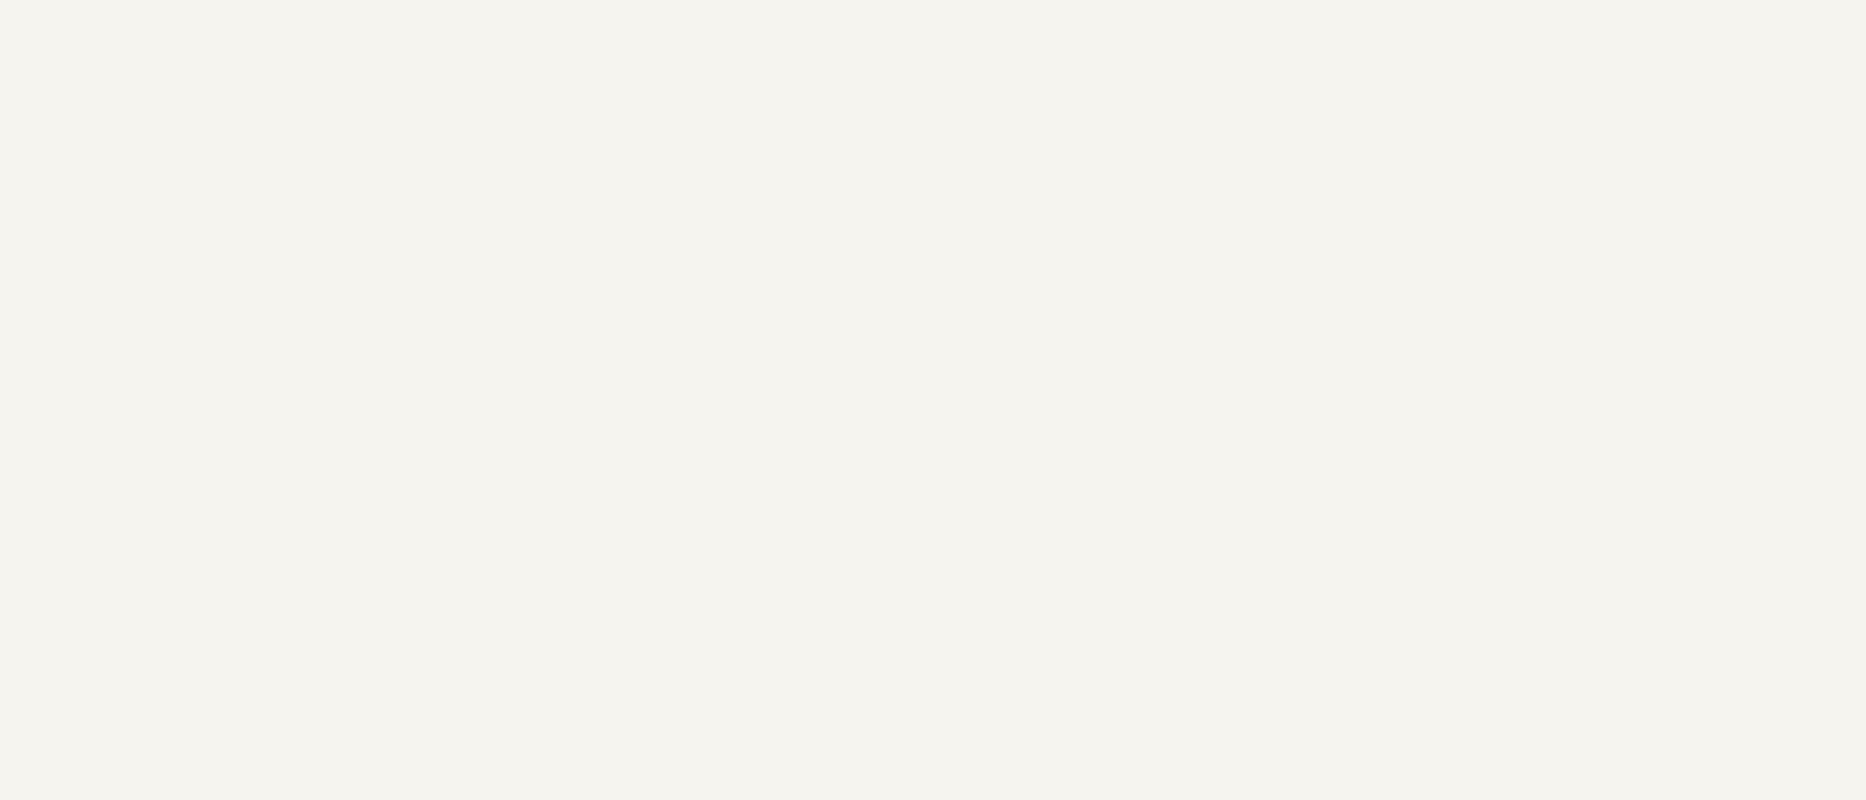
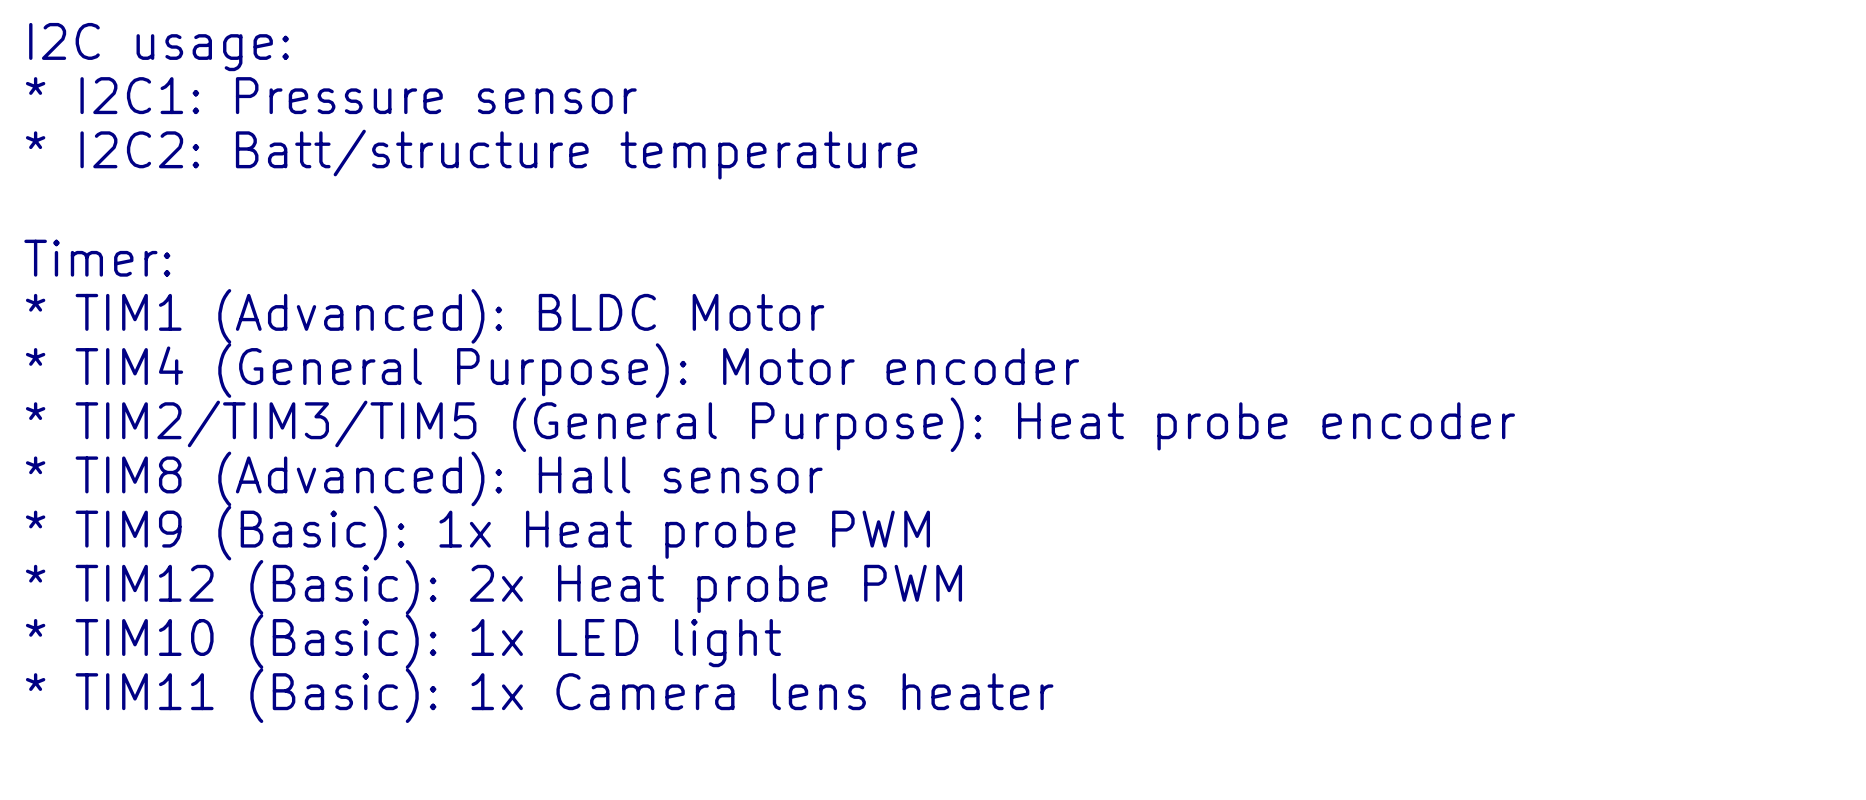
text: none -> I2C usage: (159, 47)
text: none -> * I2C1: Pressure sensor (331, 95)
text: none -> * I2C2: Batt/structure temperature (471, 154)
text: none -> Timer: (97, 258)
text: none -> * TIM1 (Advanced): BLDC Motor (425, 316)
text: none -> * TIM4 (General Purpose): Motor encoder (552, 370)
text: none -> * TIM2/TIM3/TIM5 (General Purpose): Heat probe encoder (770, 424)
text: none -> * TIM8 (Advanced): Hall sensor (424, 478)
text: none -> * TIM9 (Basic): 1x Heat probe PWM (477, 533)
text: none -> * TIM12 (Basic): 2x Heat probe PWM (493, 587)
text: none -> * TIM10 (Basic): 1x LED light (403, 641)
text: none -> * TIM11 (Basic): 1x Camera lens heater (539, 695)

